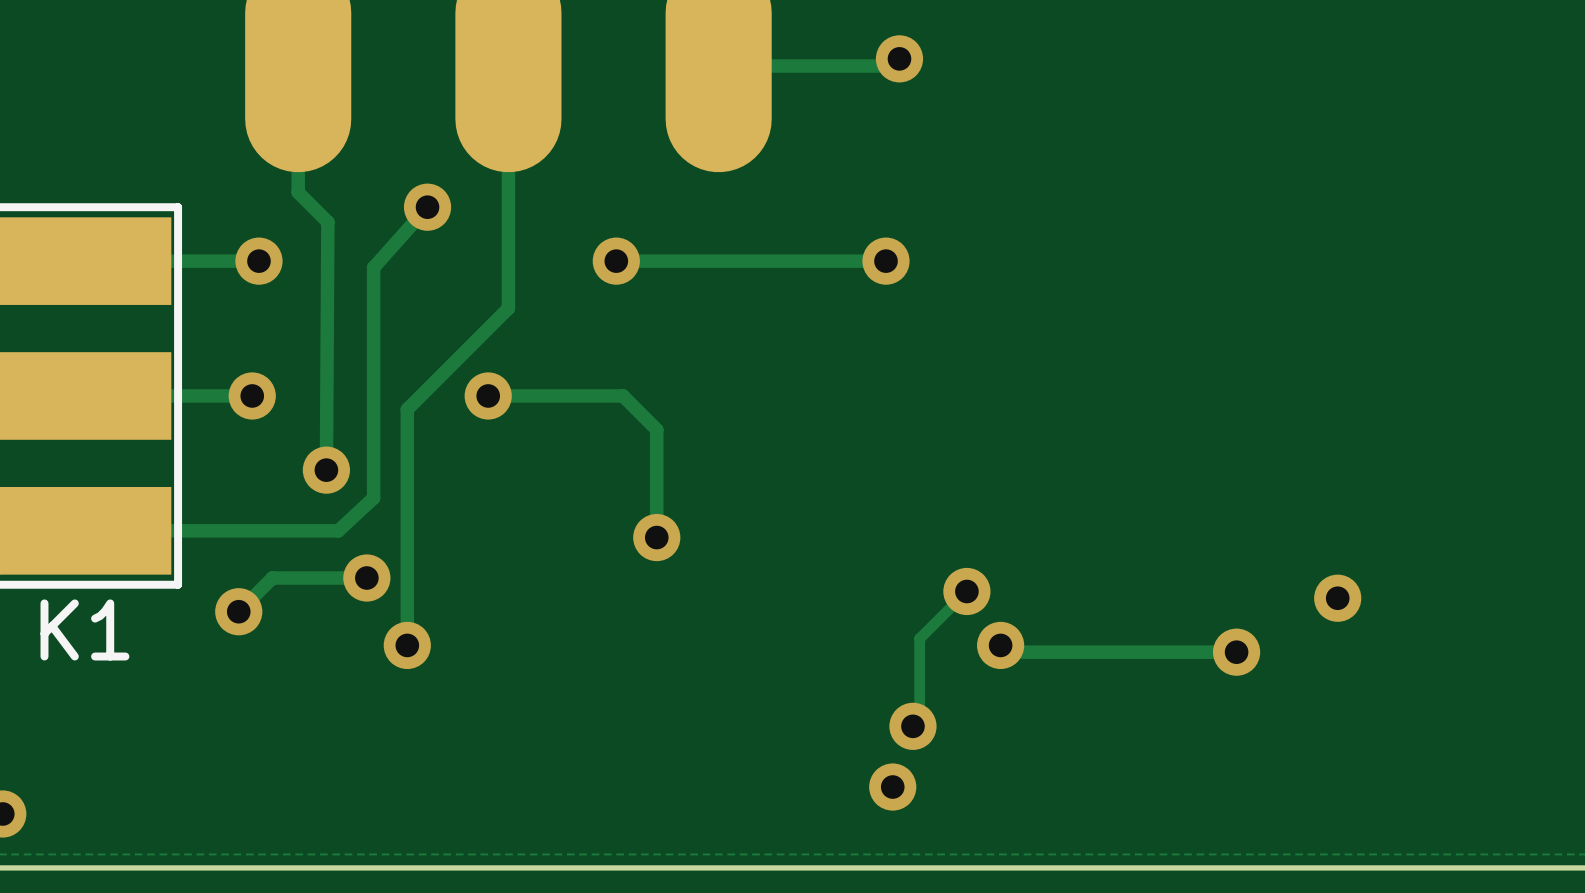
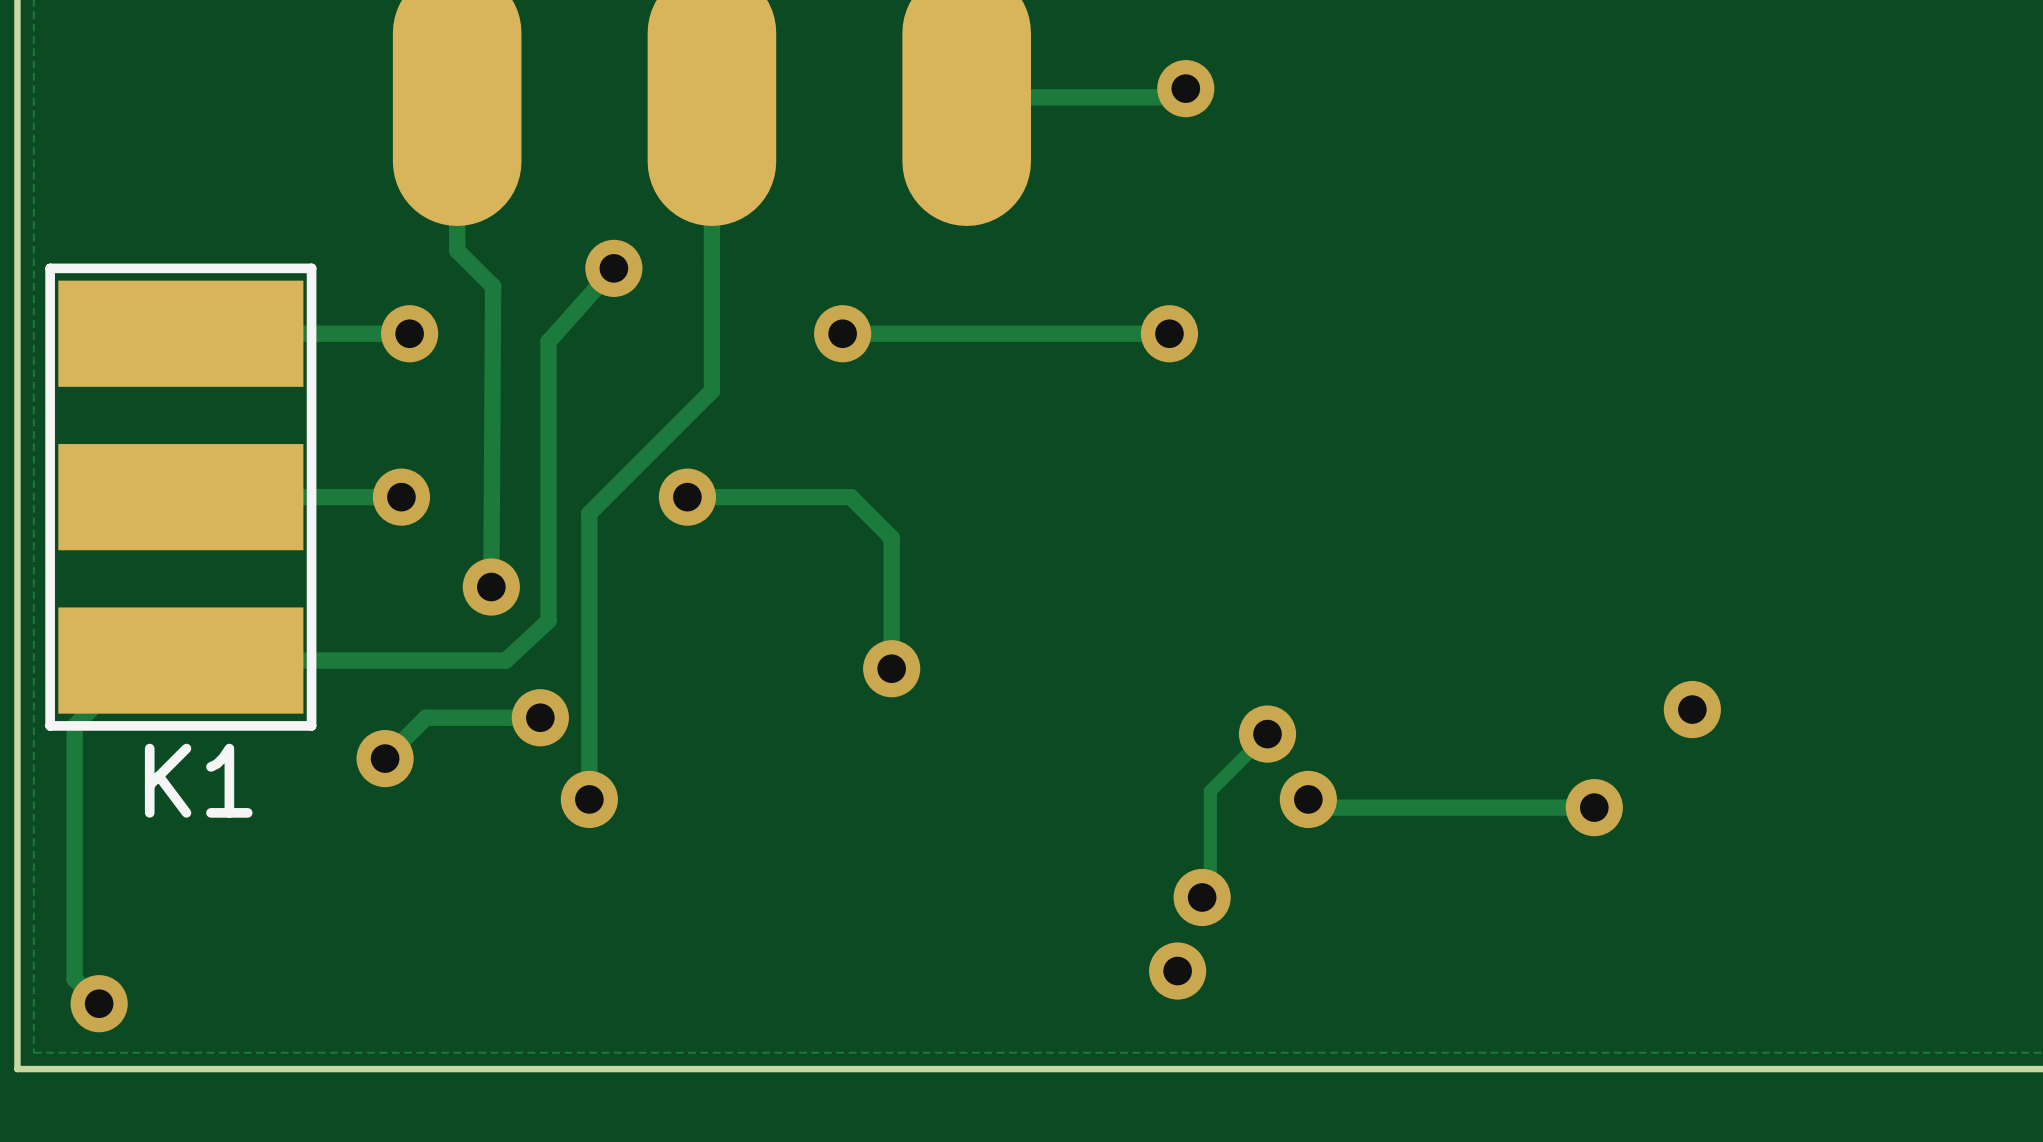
via position: (1337, 598) -> (1692, 709)

